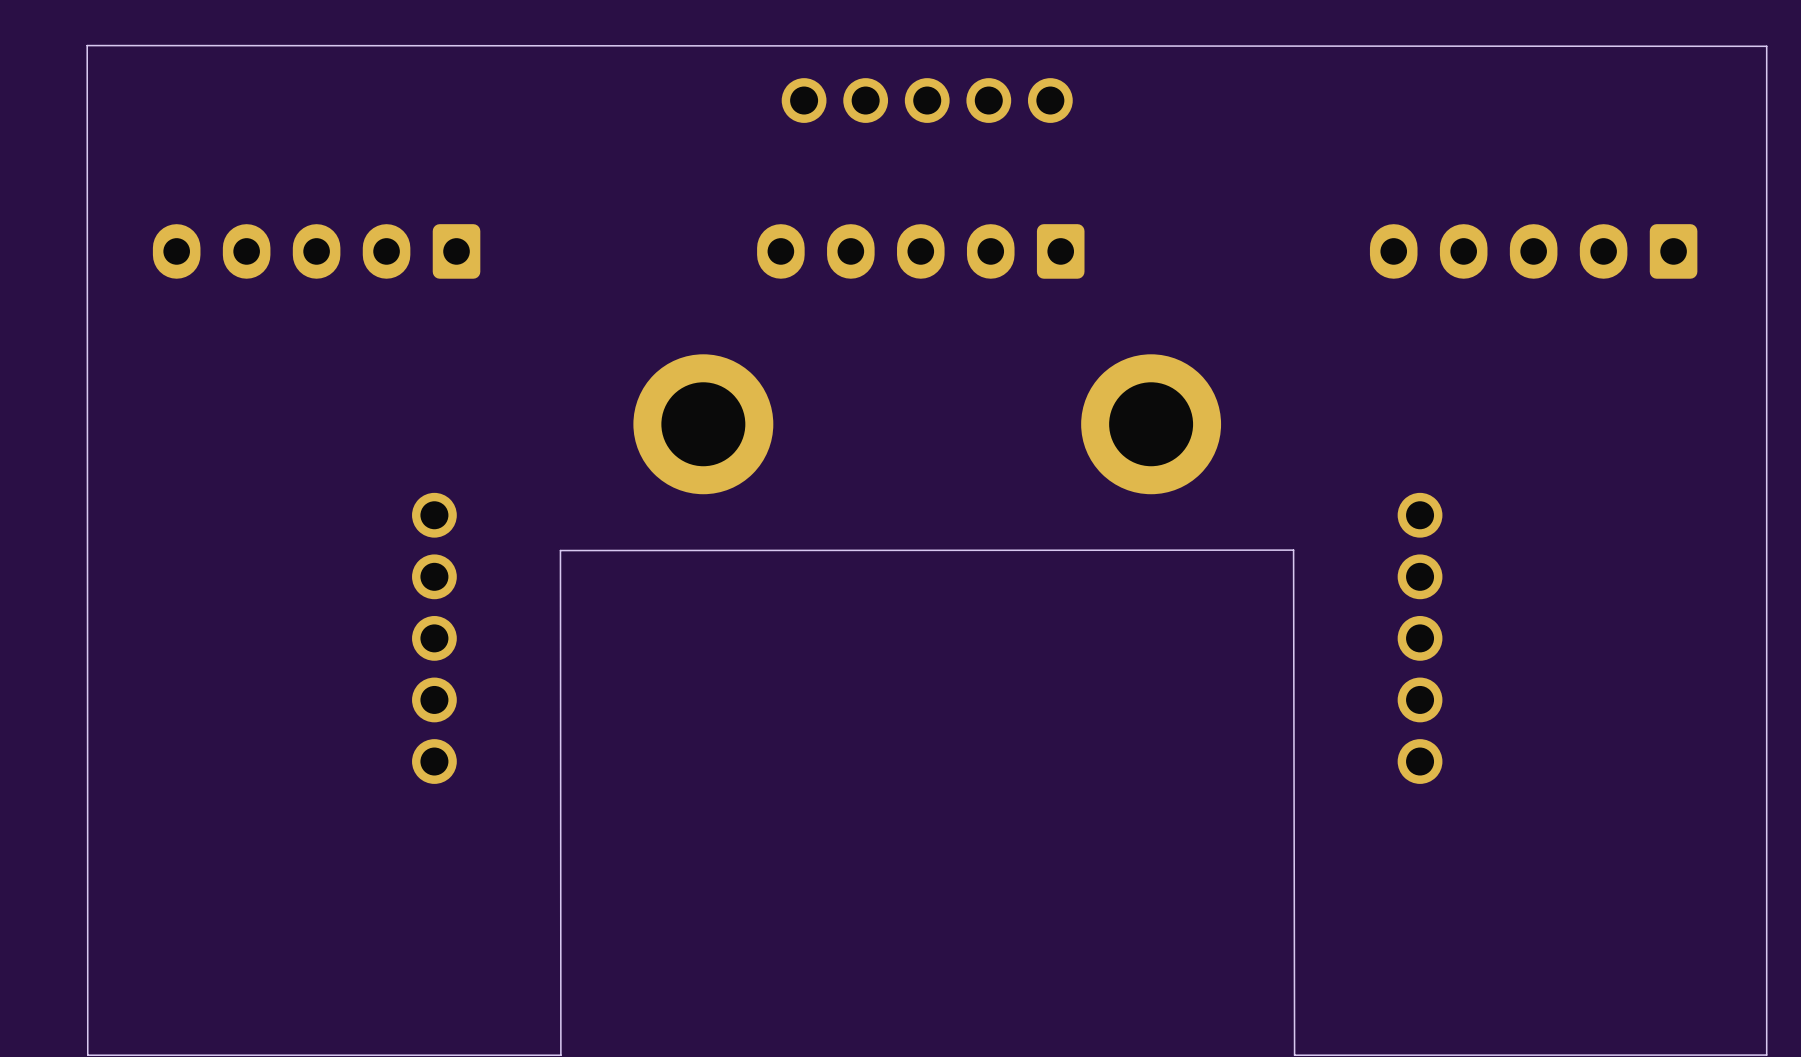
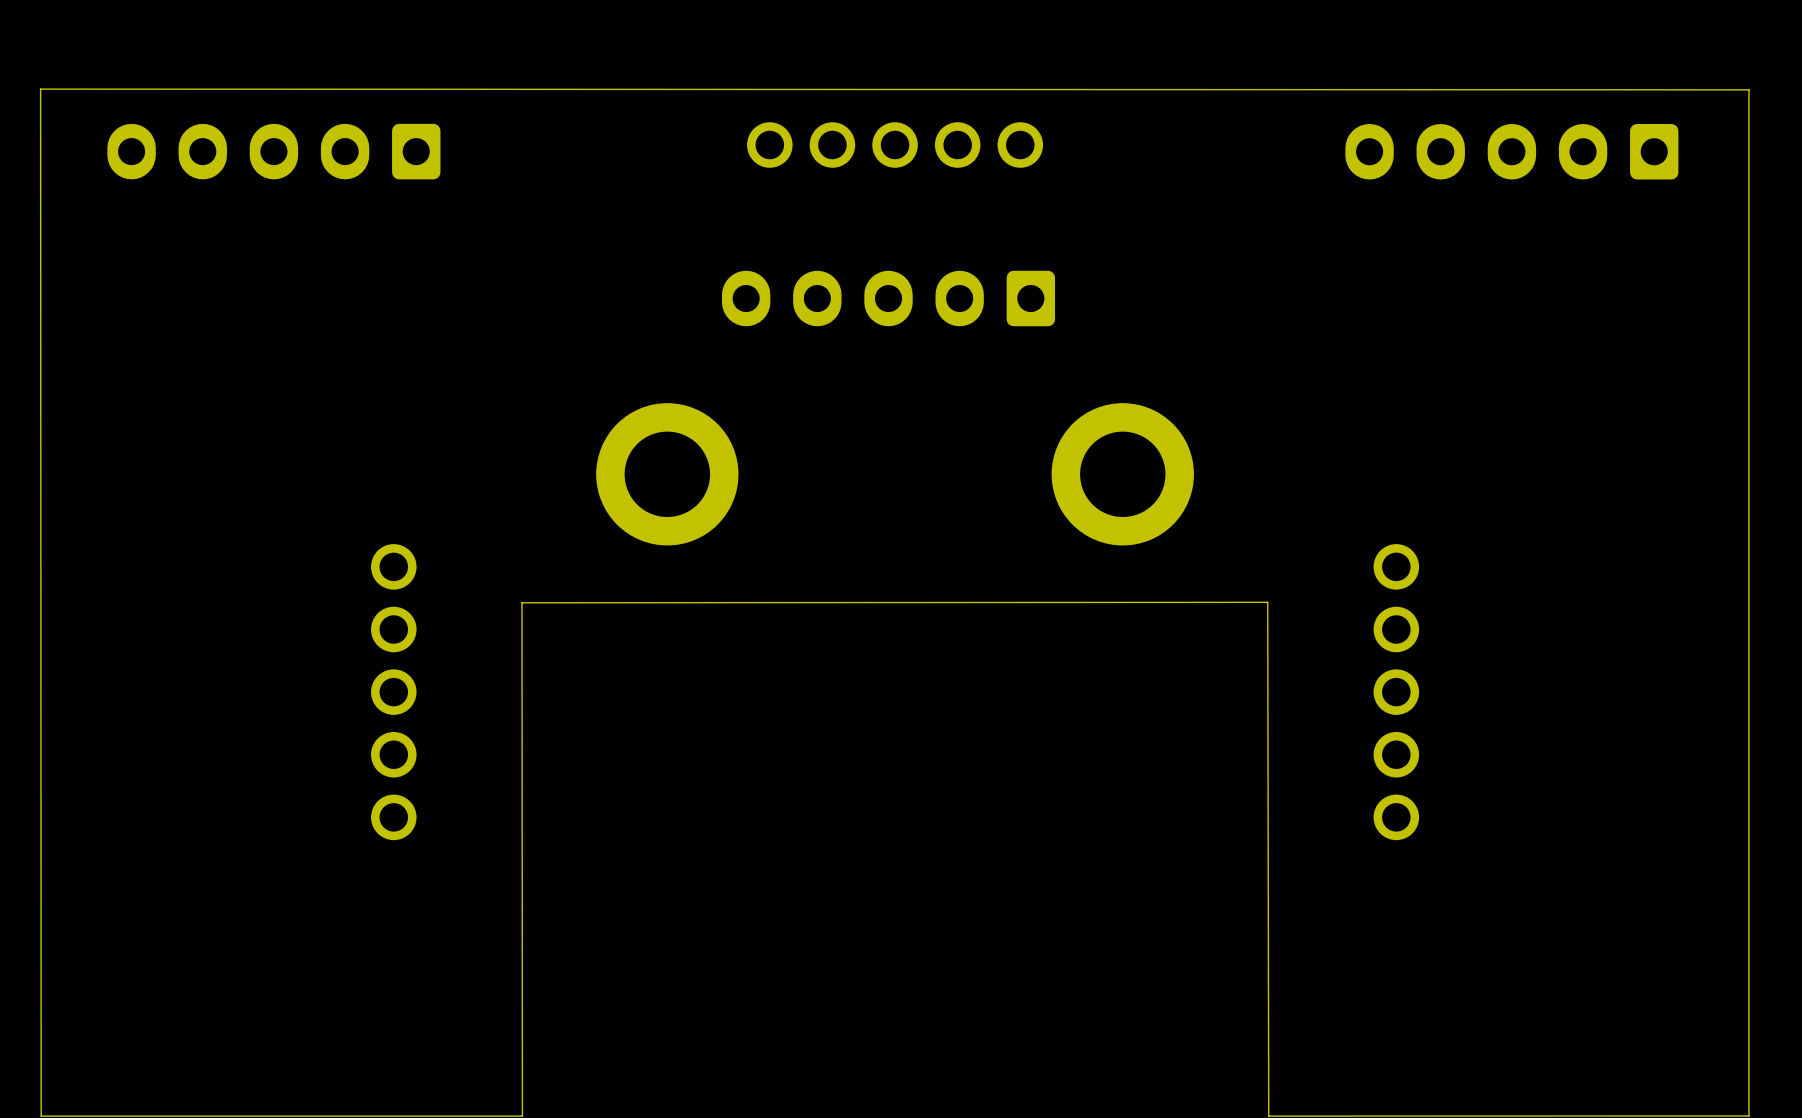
part position: (316, 251) -> (273, 151)
part position: (1533, 251) -> (1511, 151)

